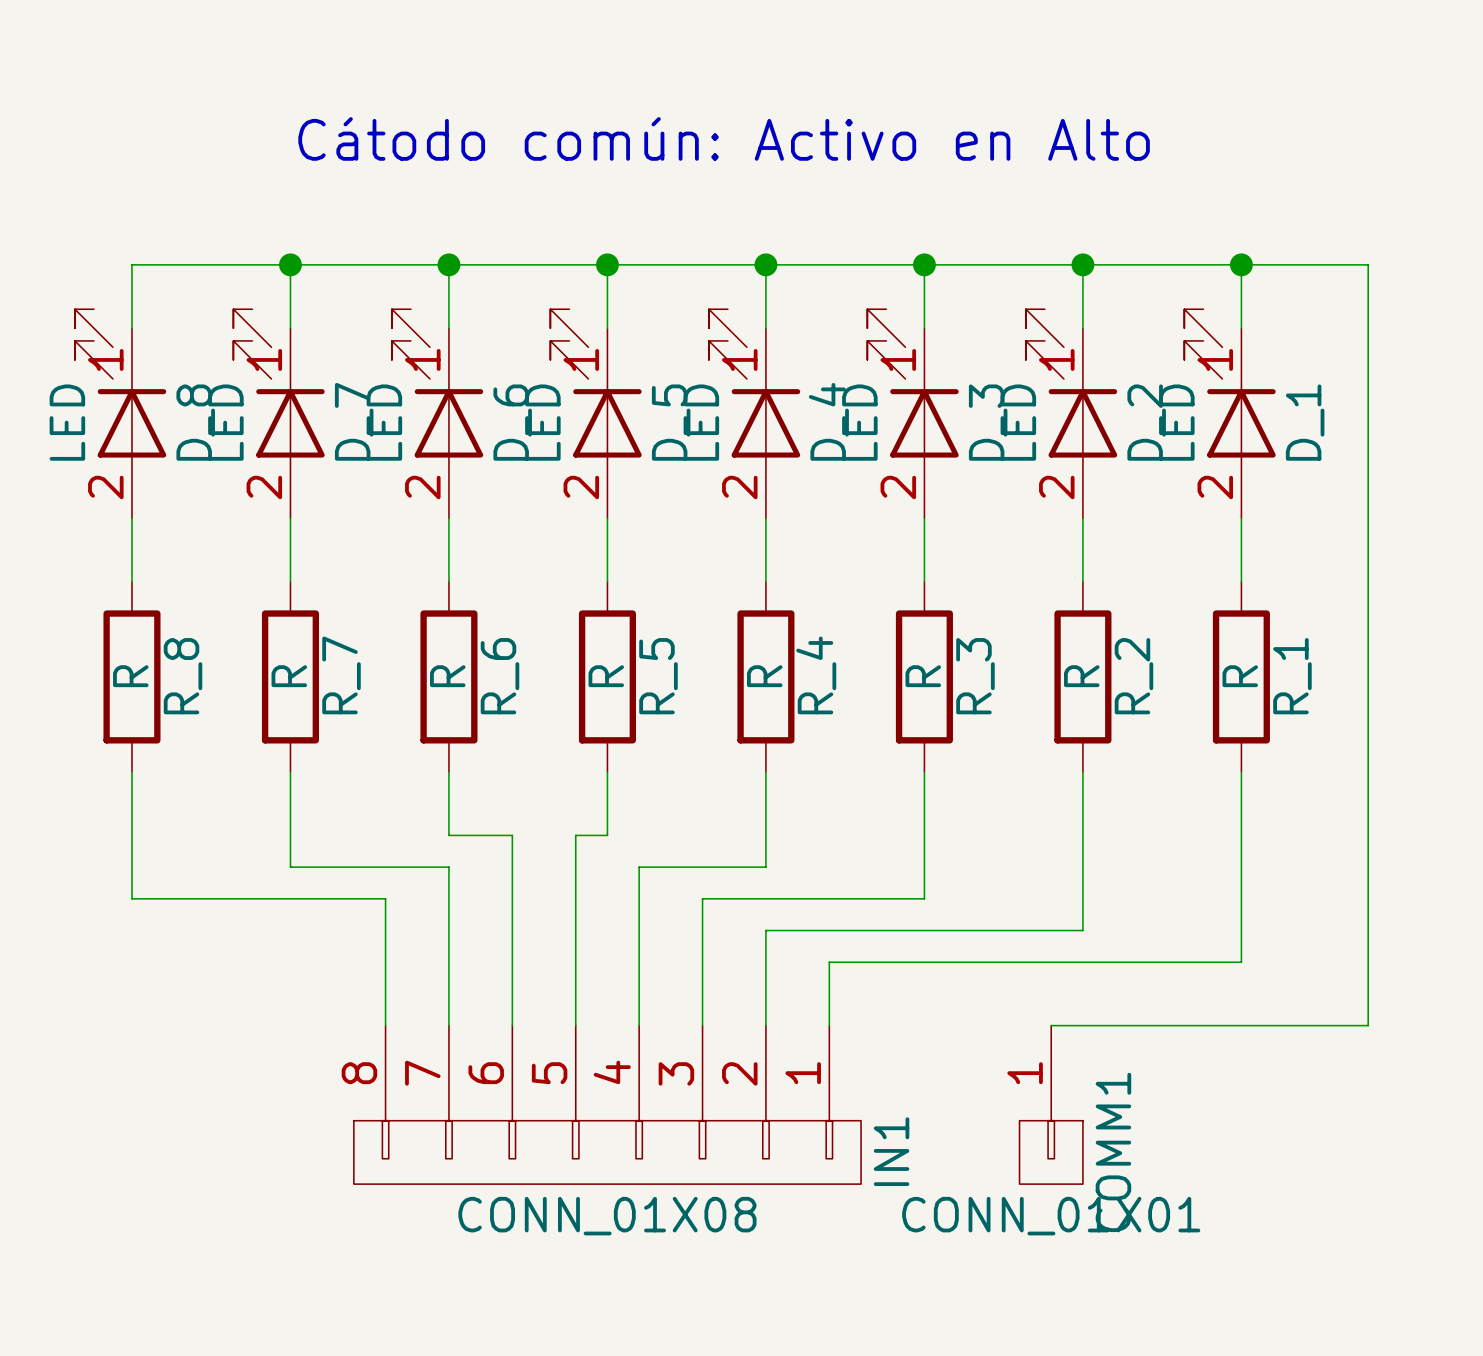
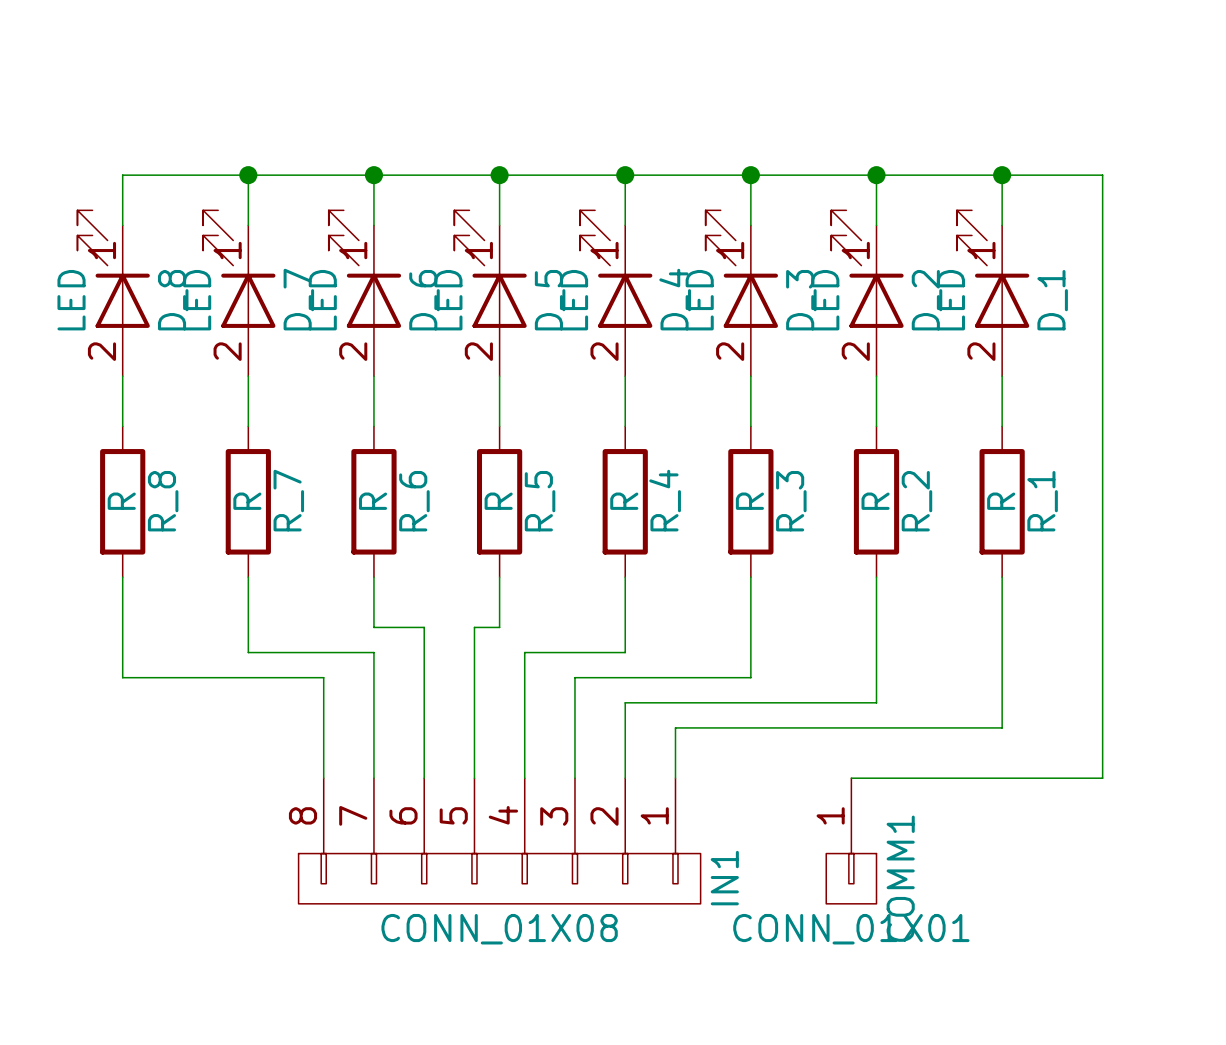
text: Cátodo común: Activo en Alto (724, 138) -> none

